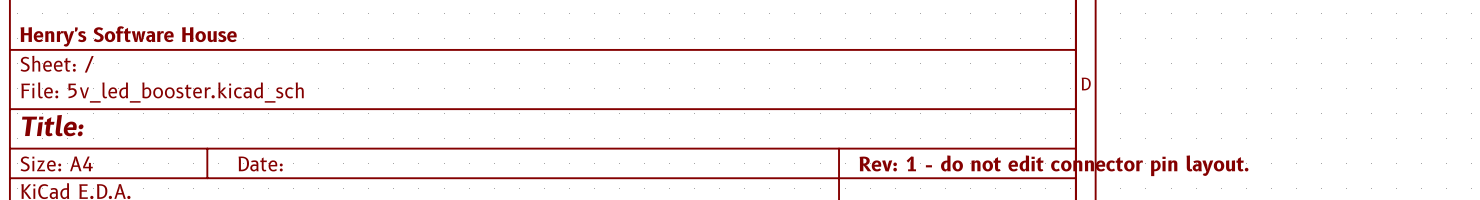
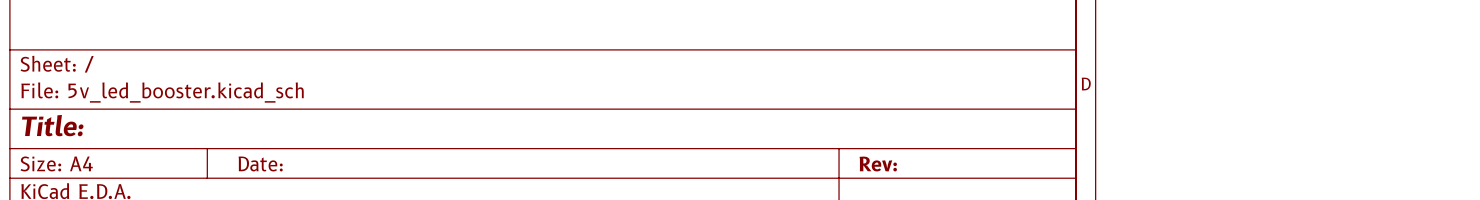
title block: Henry's Software House (128, 36) -> none
title block: Rev: 1 - do not edit connector pin layout. (1053, 165) -> Rev: (878, 164)

